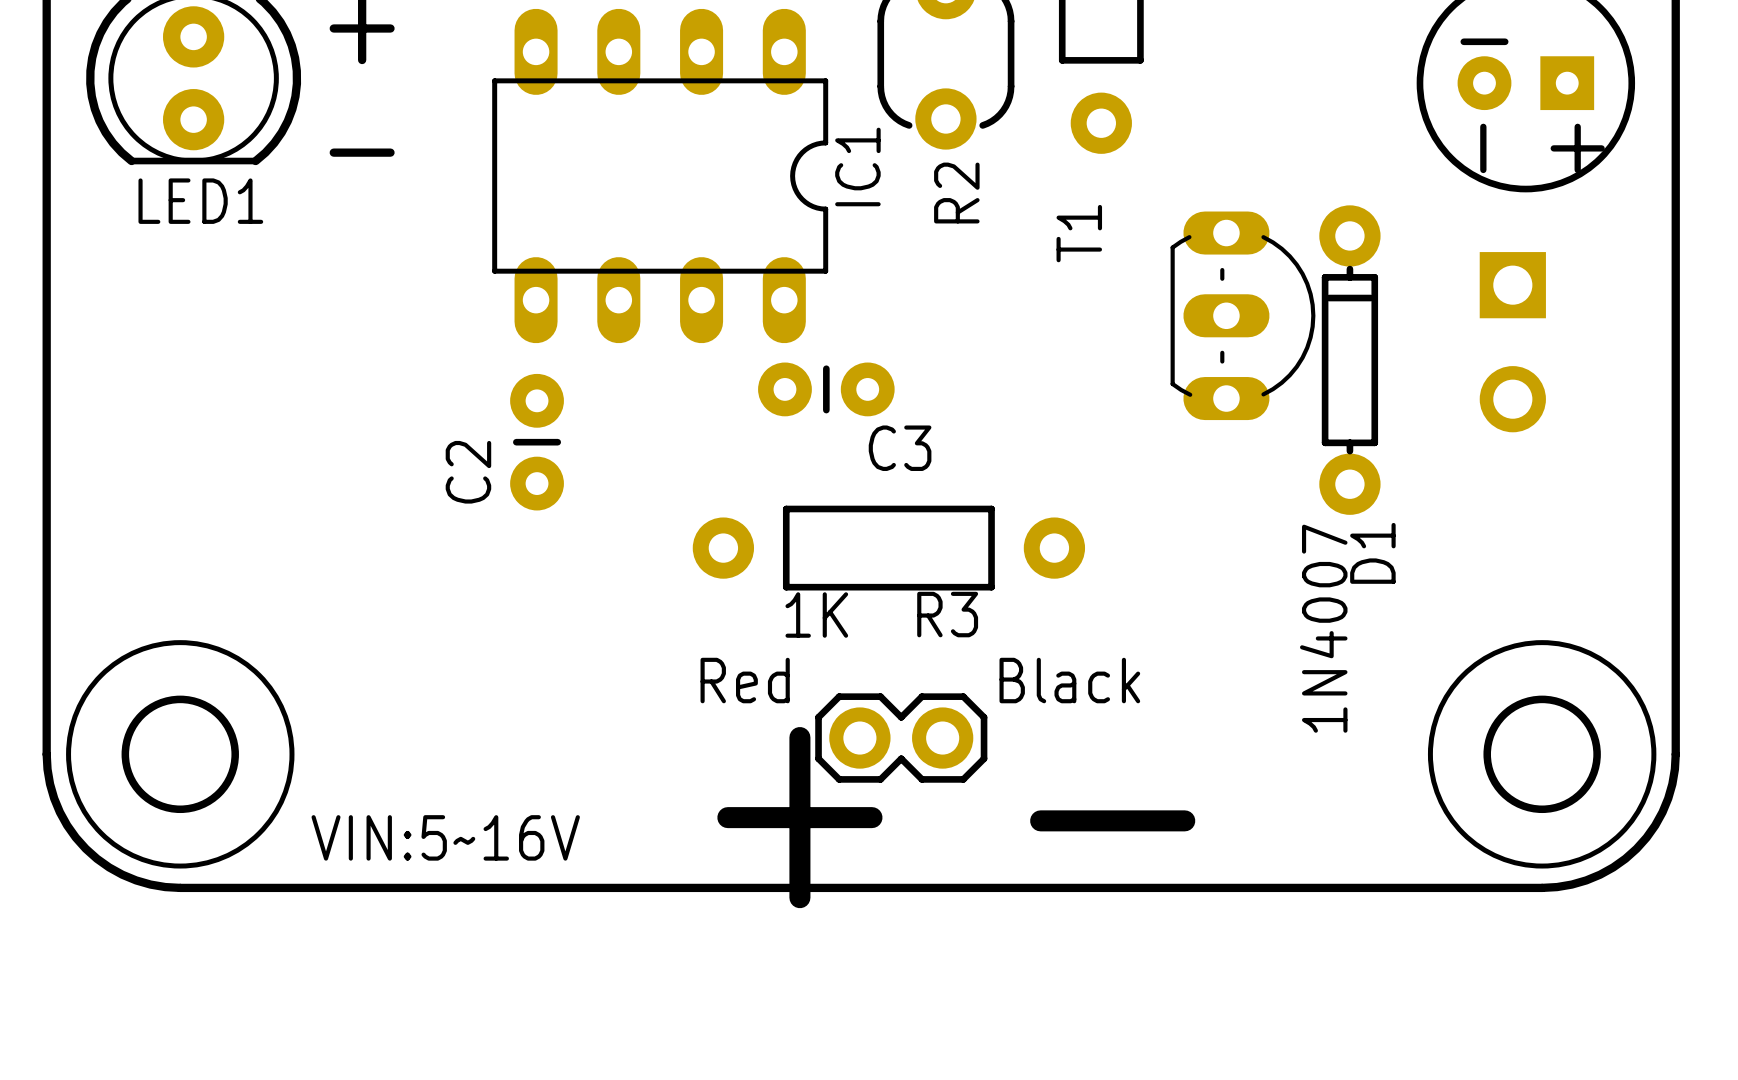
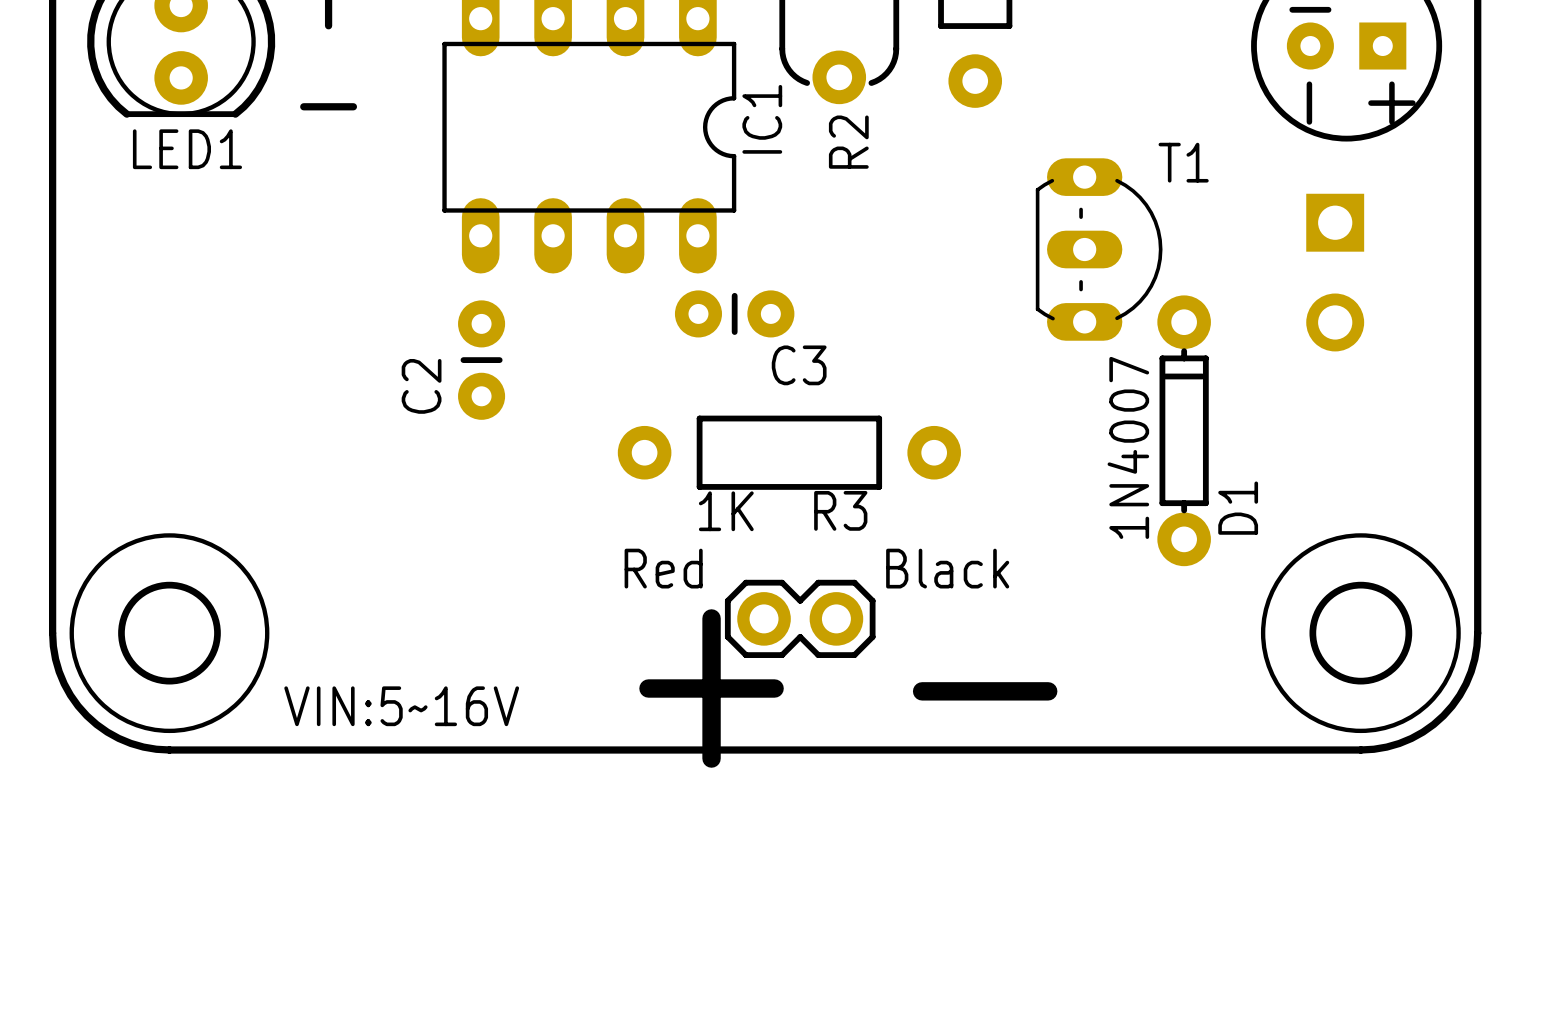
T1 name rotation: 0° (1079, 233) -> 90° clockwise (1183, 162)
T1 name position: T1 (1079, 233) -> T1 (1183, 162)
D1 position: (1349, 360) -> (1184, 430)
D1 name position: D1 (1372, 553) -> D1 (1238, 508)
D1 value position: 1N4007 (1323, 628) -> 1N4007 (1128, 447)

